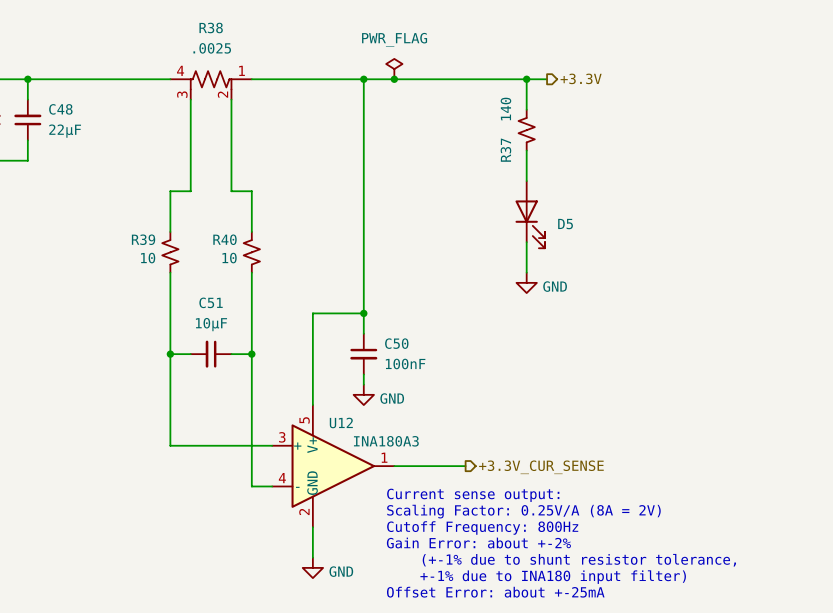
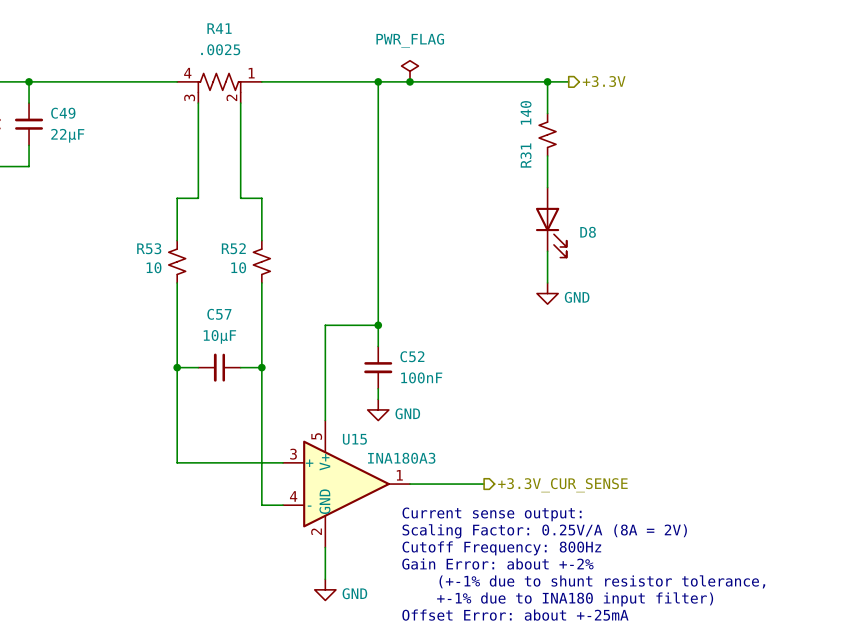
R38 name: R38 (211, 28) -> R41 (219, 28)
C48 name: C48 (60, 109) -> C49 (63, 113)
R37 name: R37 (505, 150) -> R31 (526, 155)
D5 name: D5 (565, 224) -> D8 (588, 232)
R39 name: R39 (143, 239) -> R53 (149, 248)
R40 name: R40 (224, 239) -> R52 (233, 248)
C51 name: C51 (211, 302) -> C57 (219, 314)
C50 name: C50 (396, 343) -> C52 (412, 356)
U12 name: U12 (341, 422) -> U15 (354, 439)

